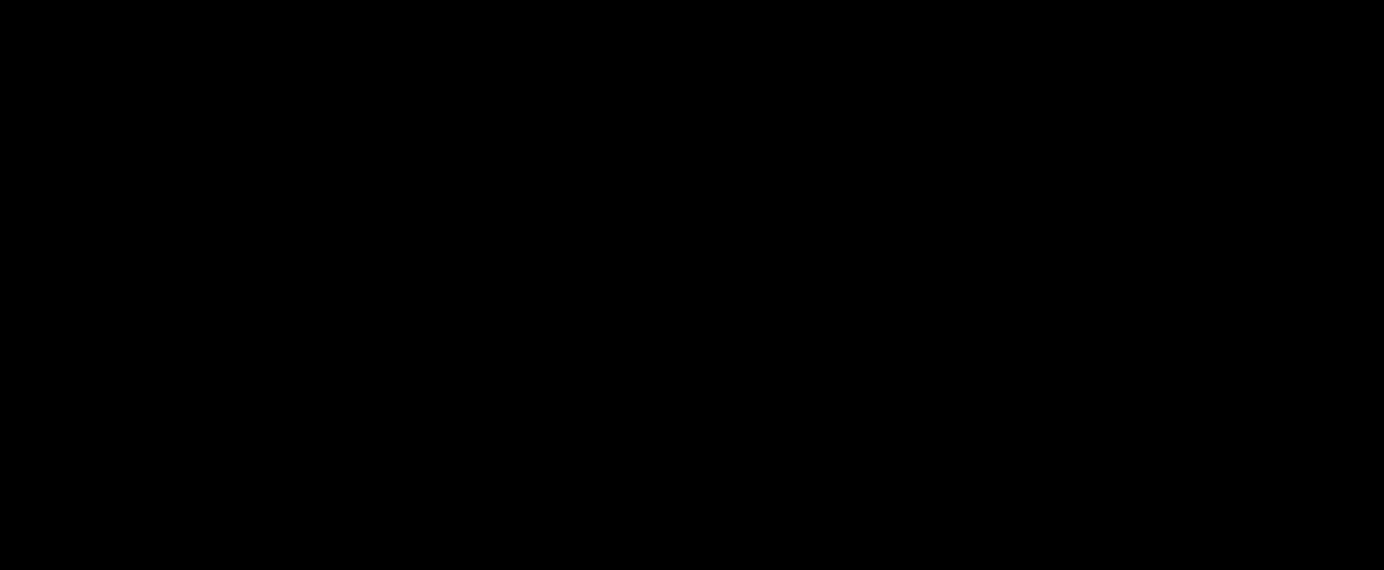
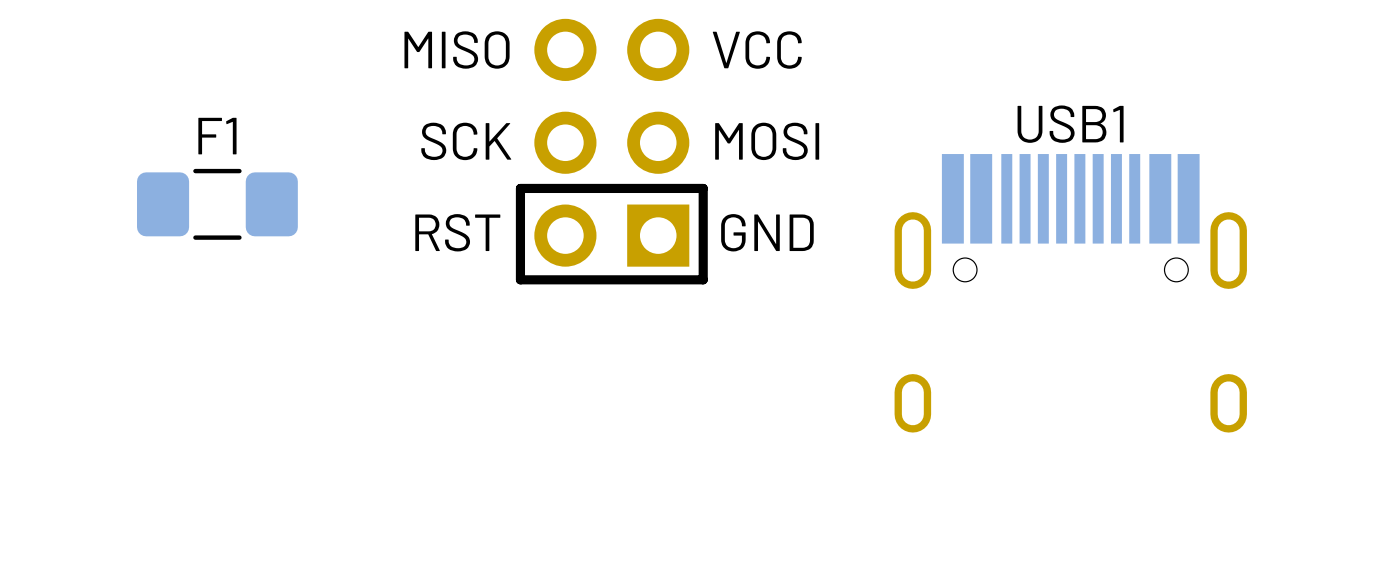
part: none -> (611, 151)
F1: none -> (217, 204)
USB1: none -> (1070, 293)

